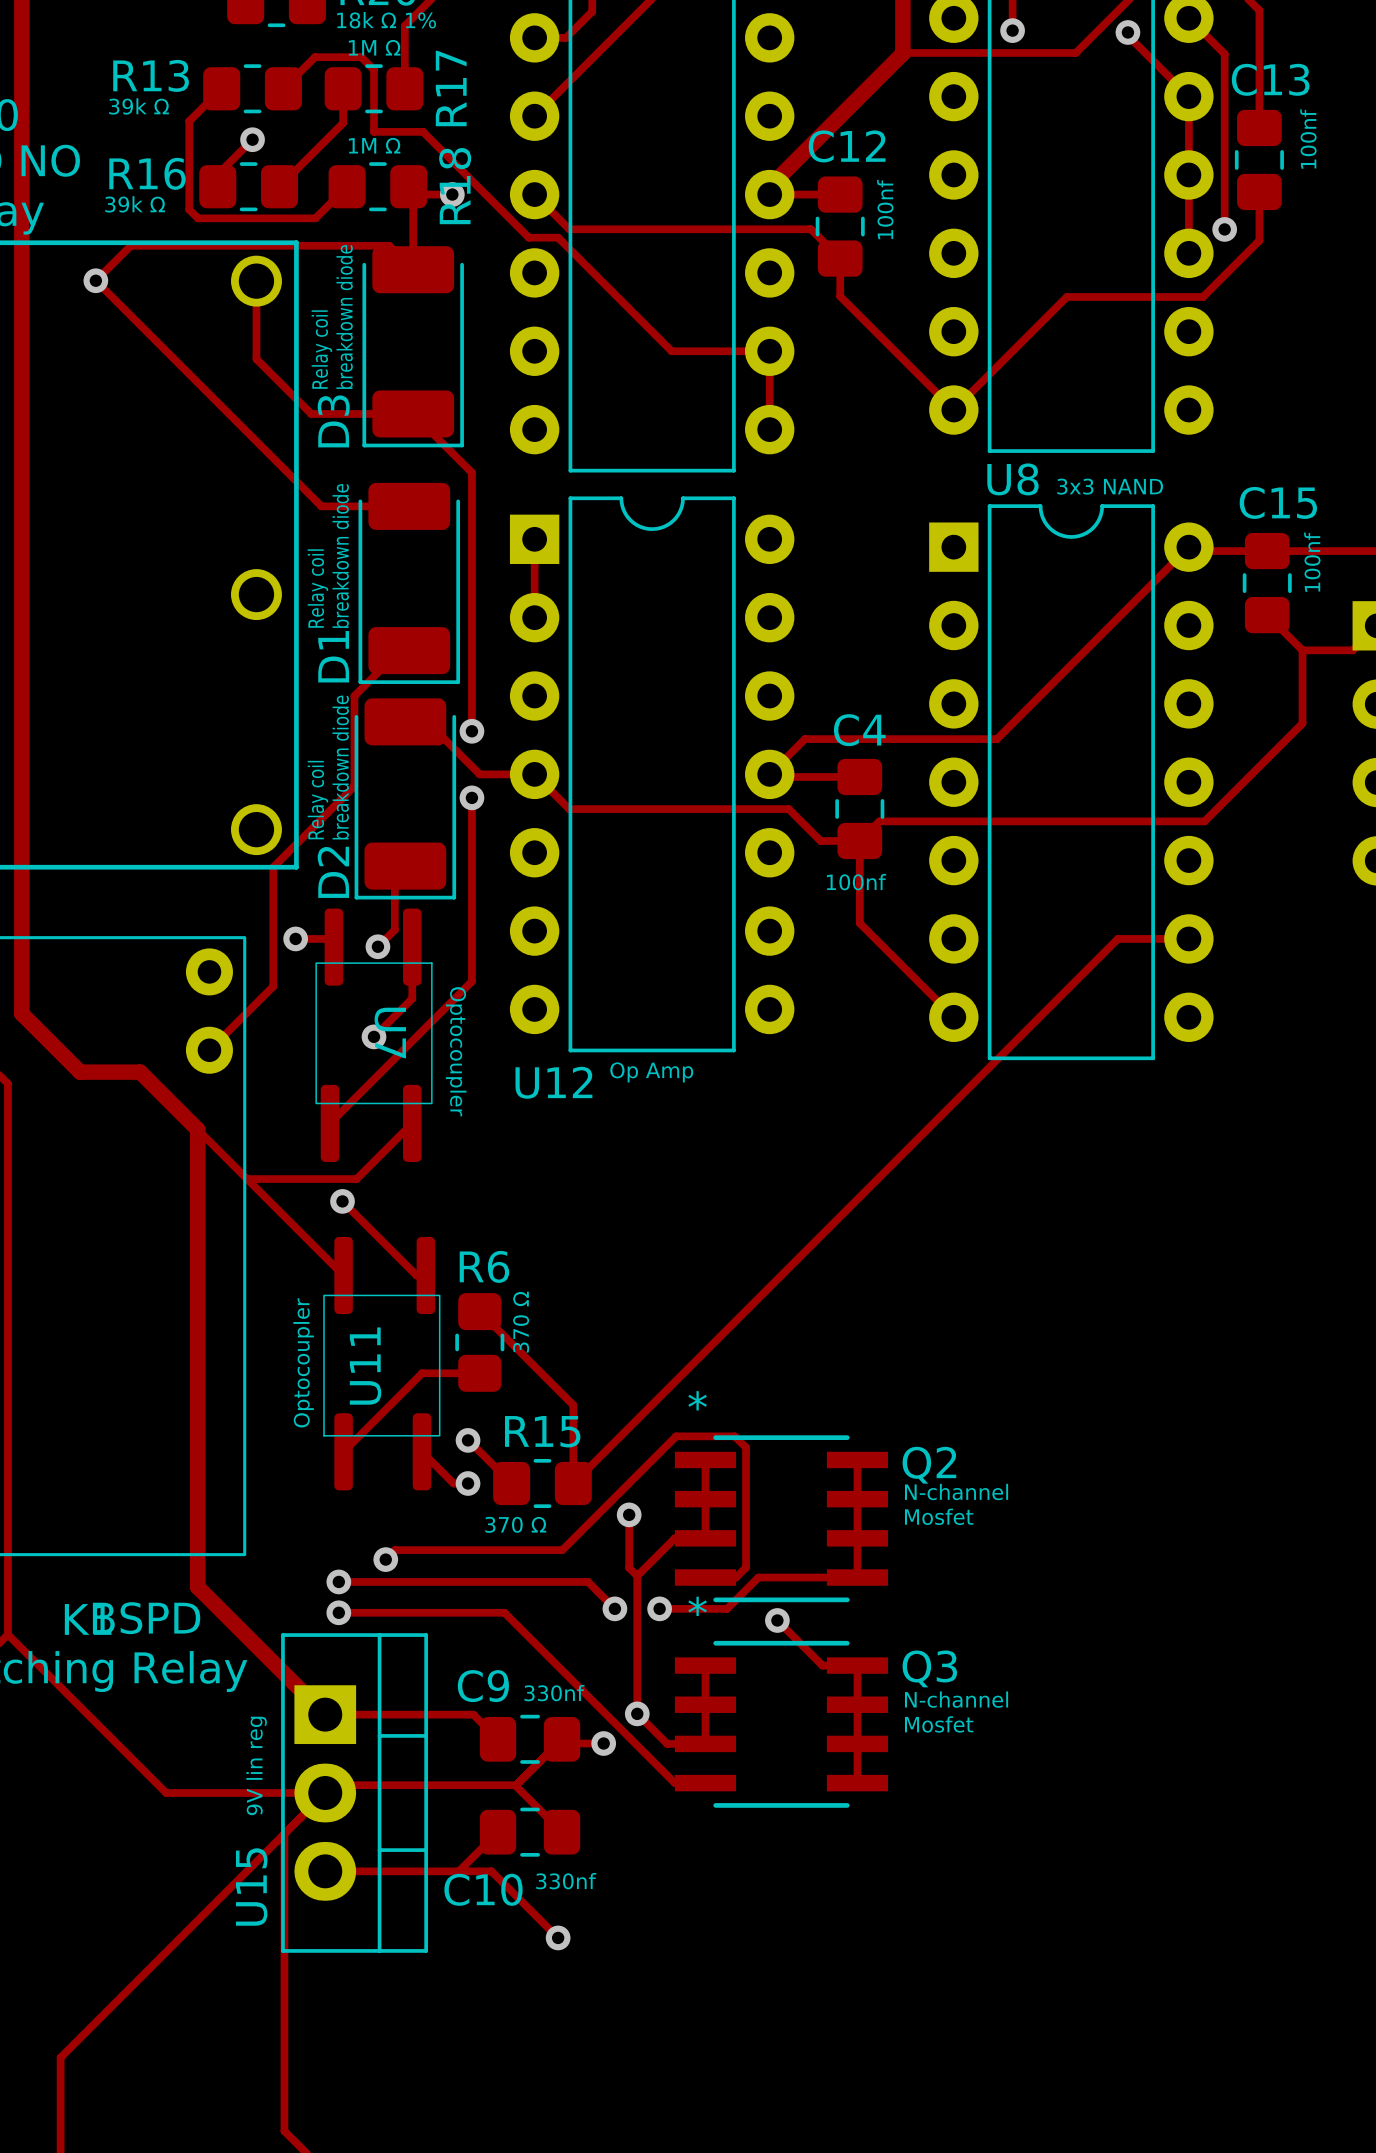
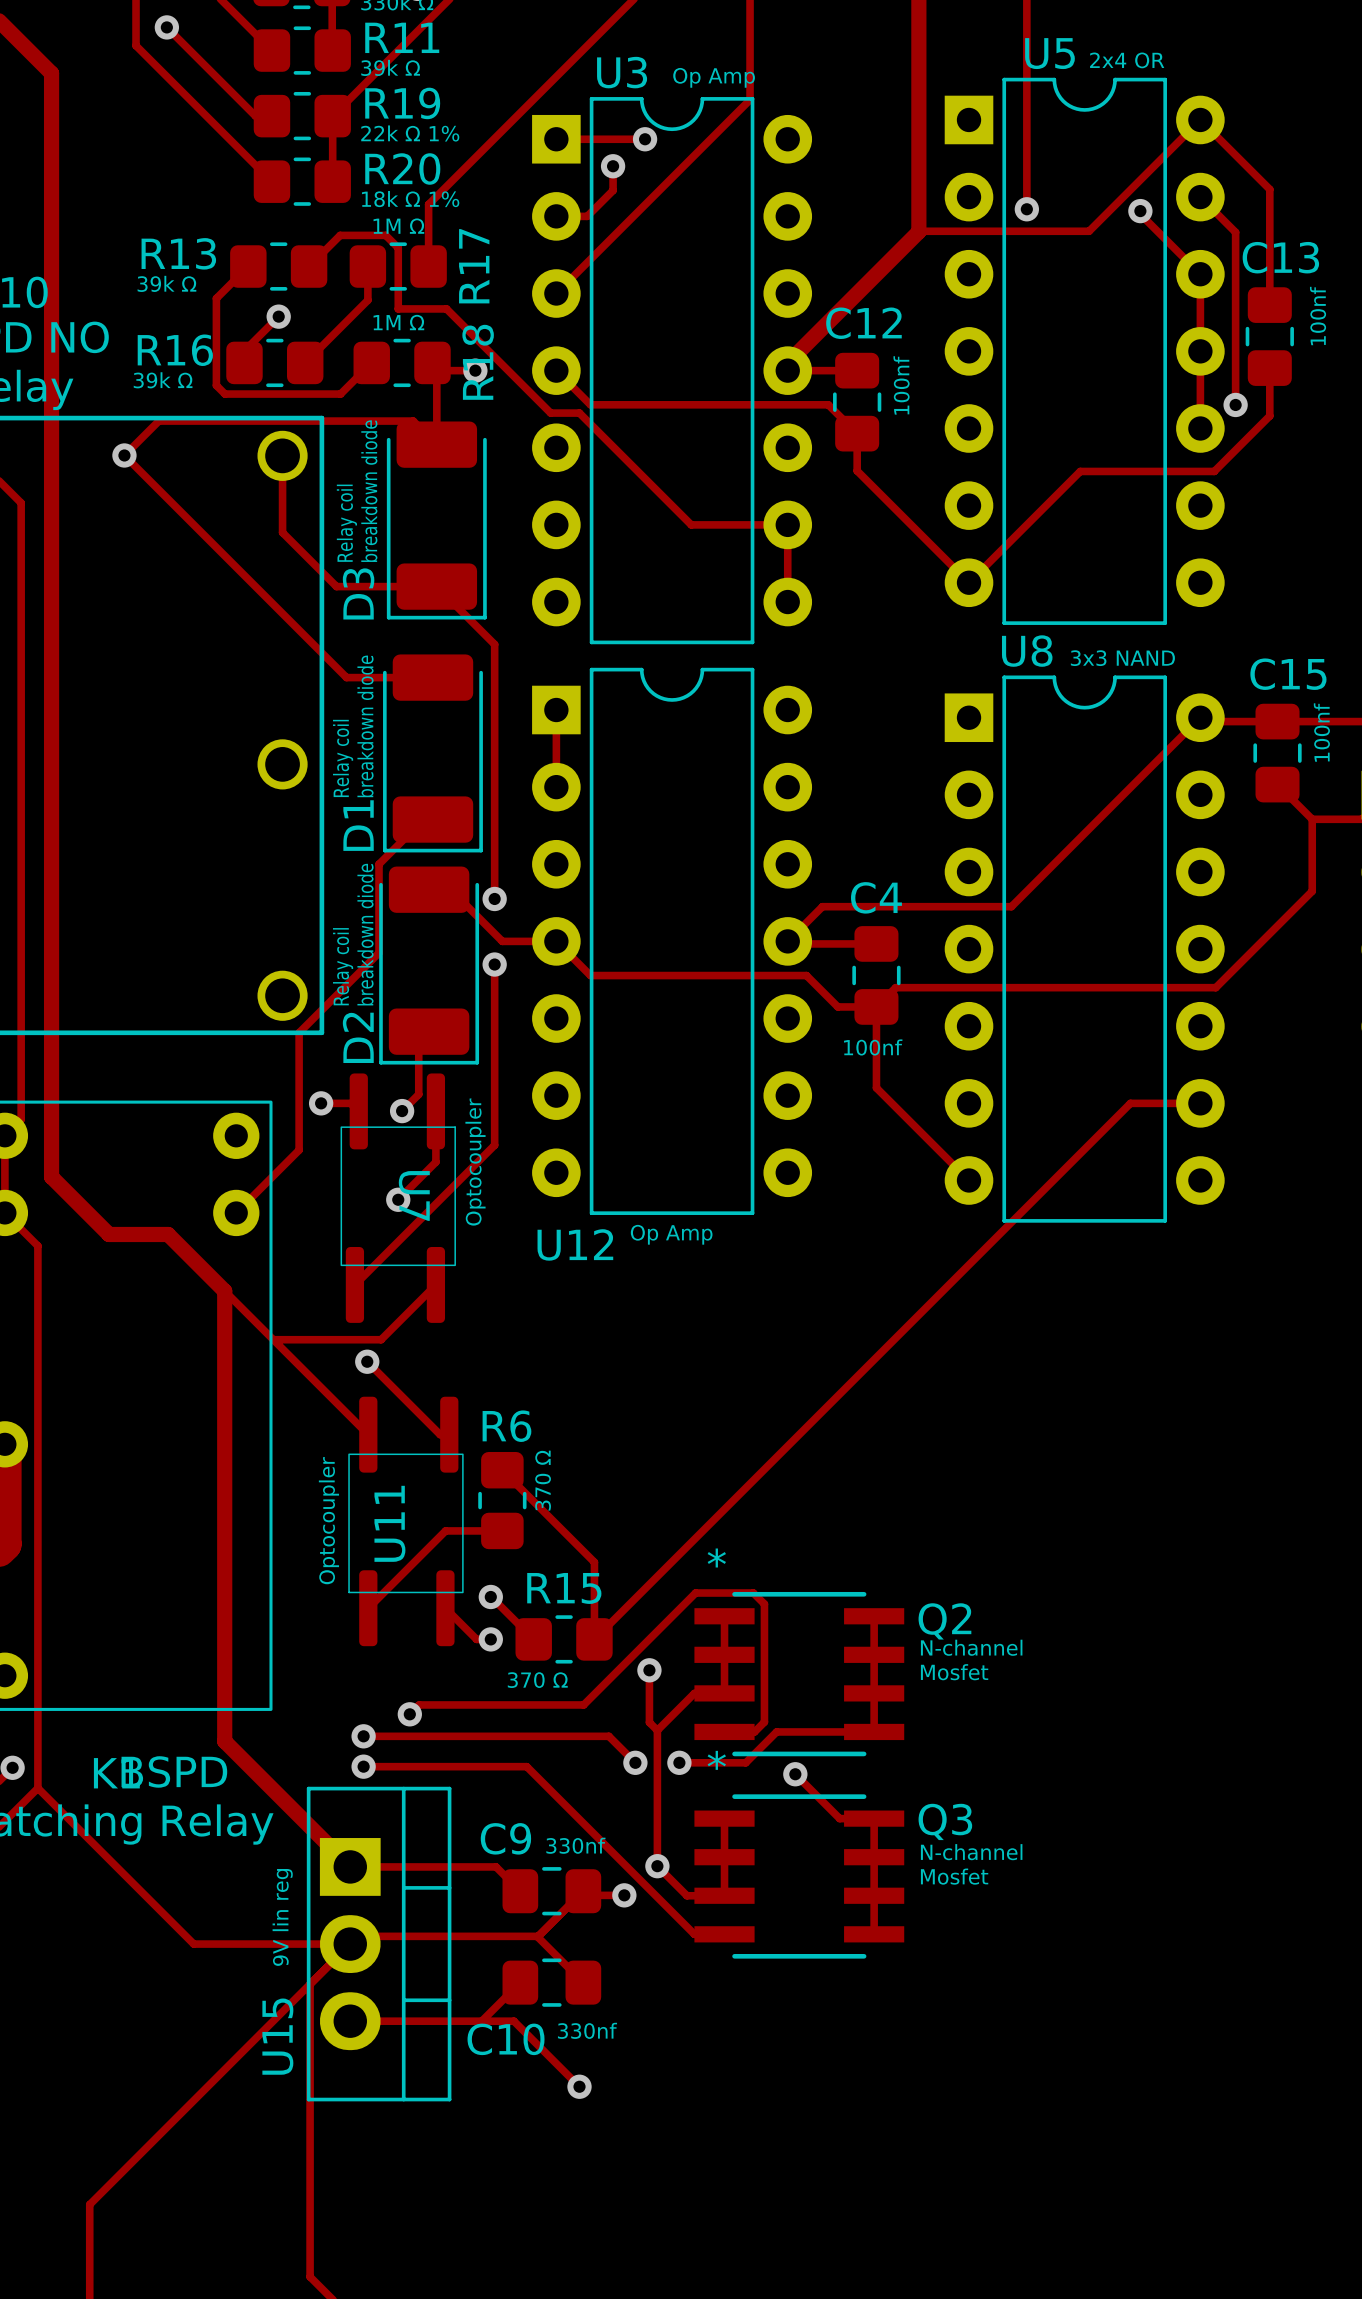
text rotation: 0° (456, 1051) -> 180° (475, 1162)

